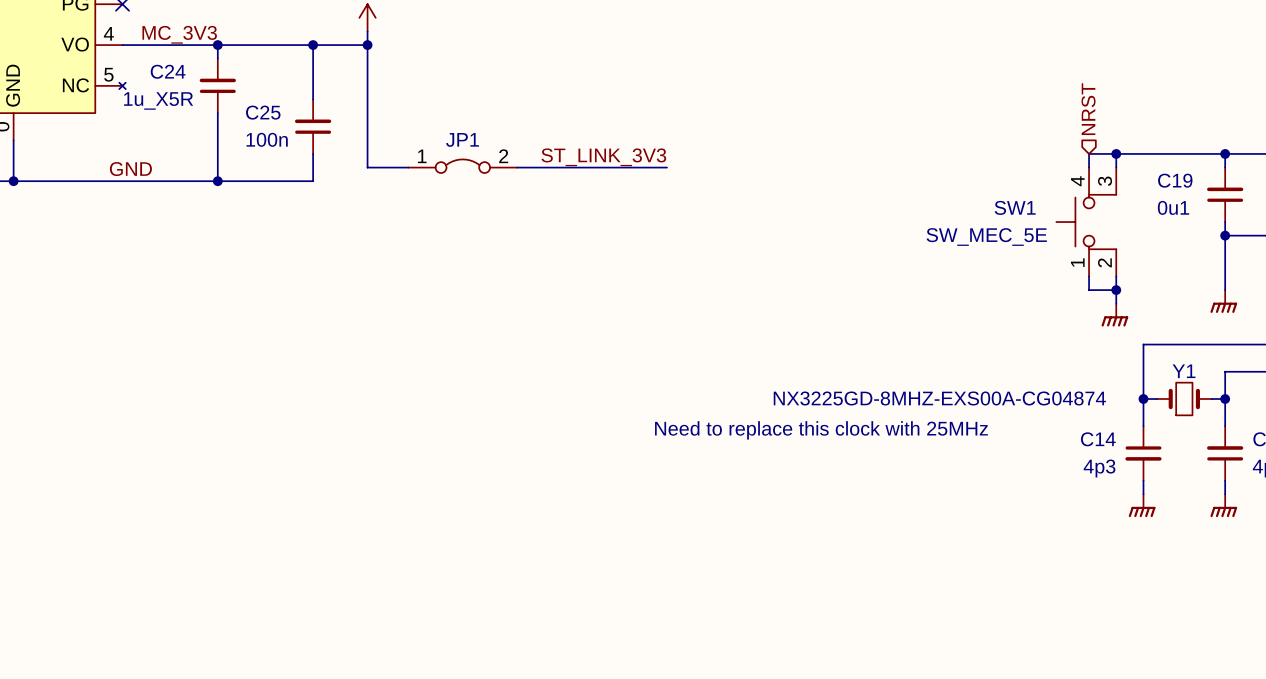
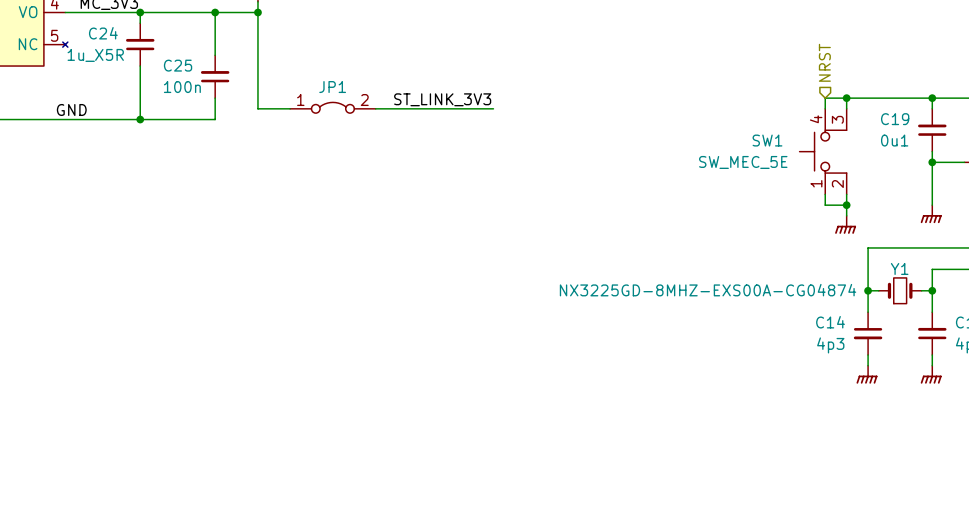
text: Need to replace this clock with 25MHz (821, 430) -> none

